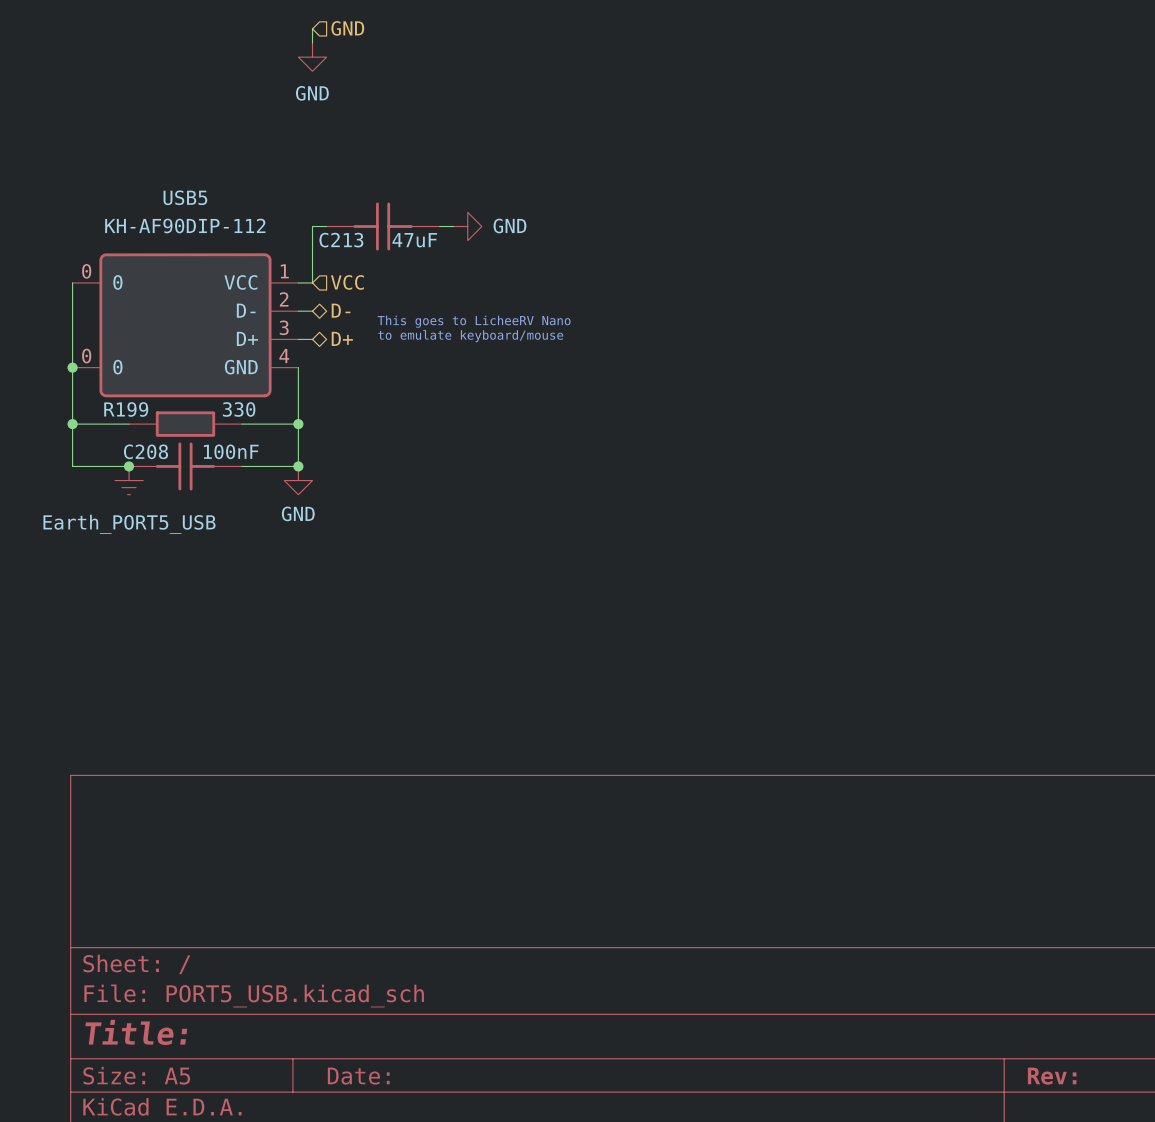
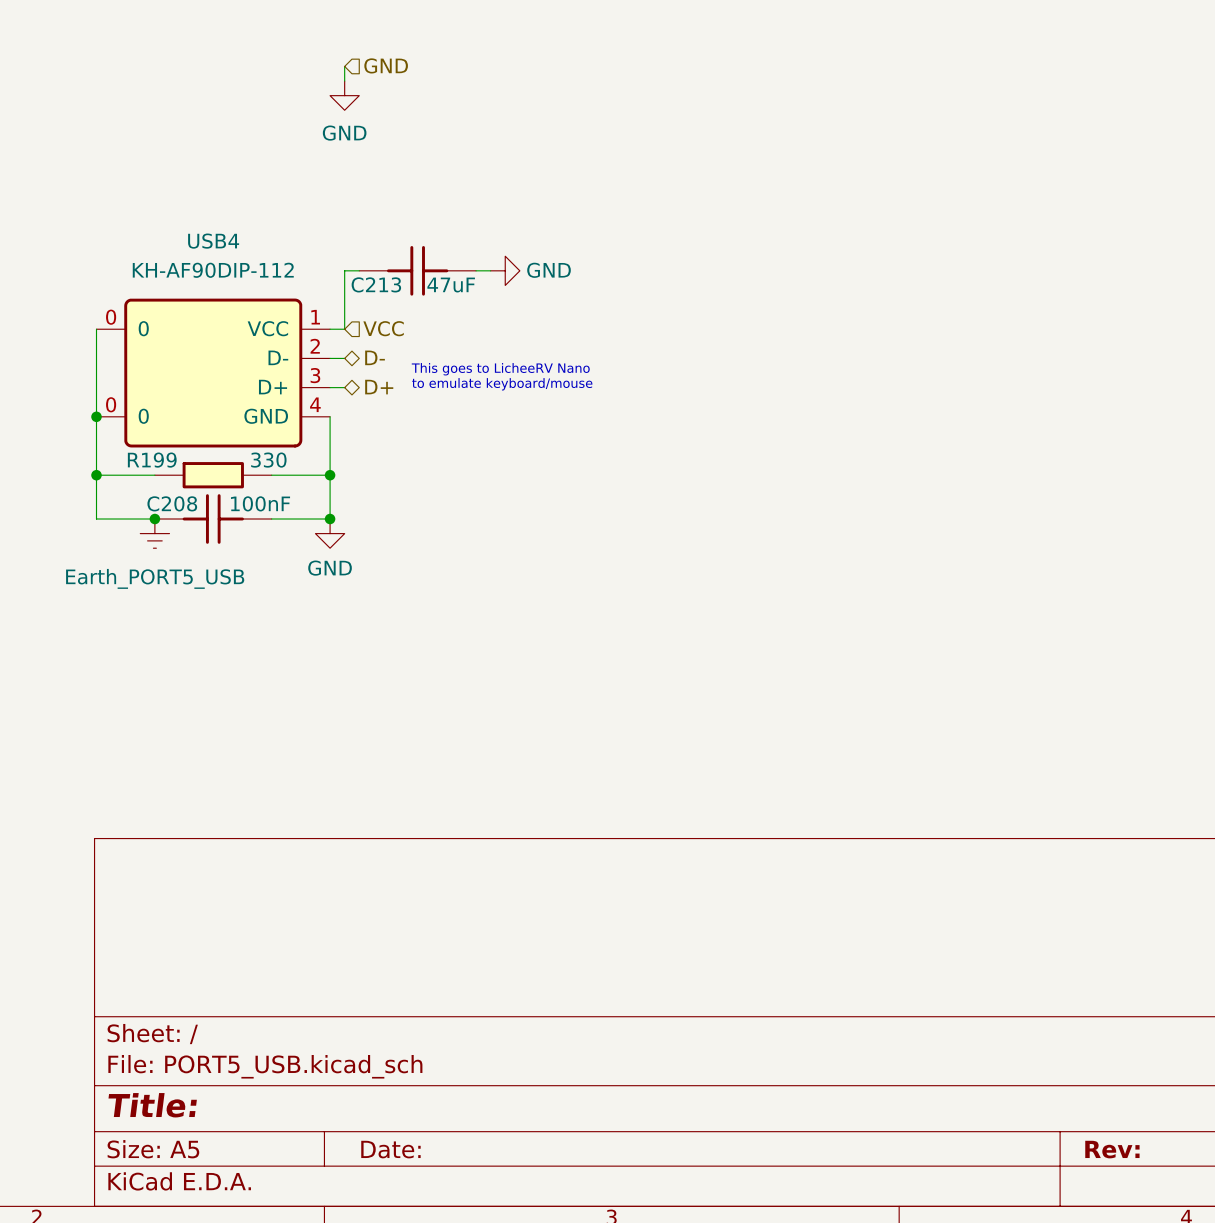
USB5 name: USB5 (185, 197) -> USB4 (213, 241)

